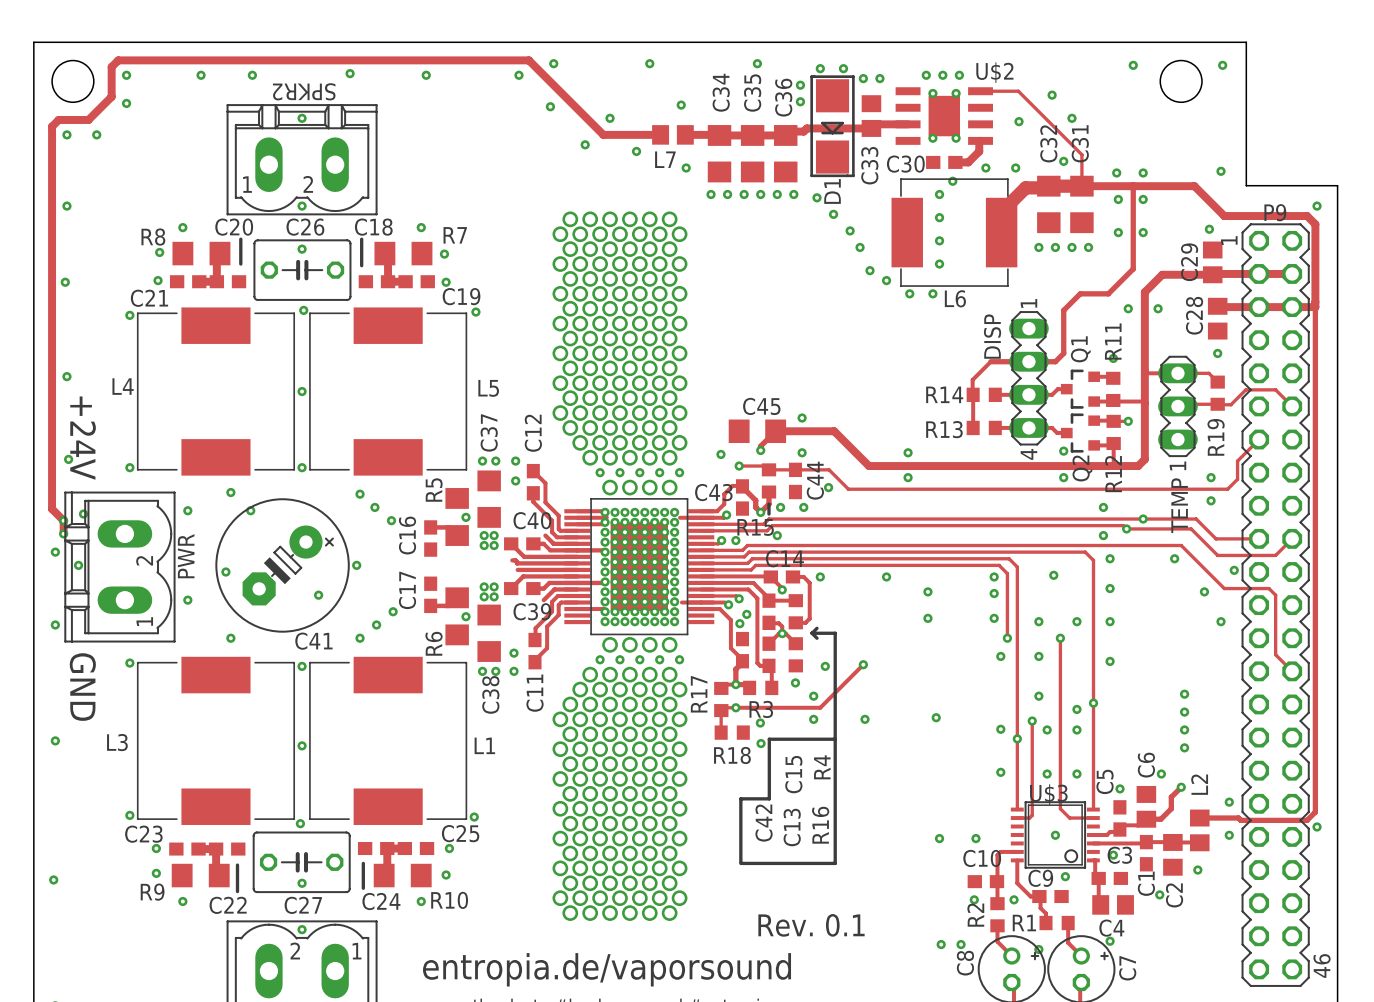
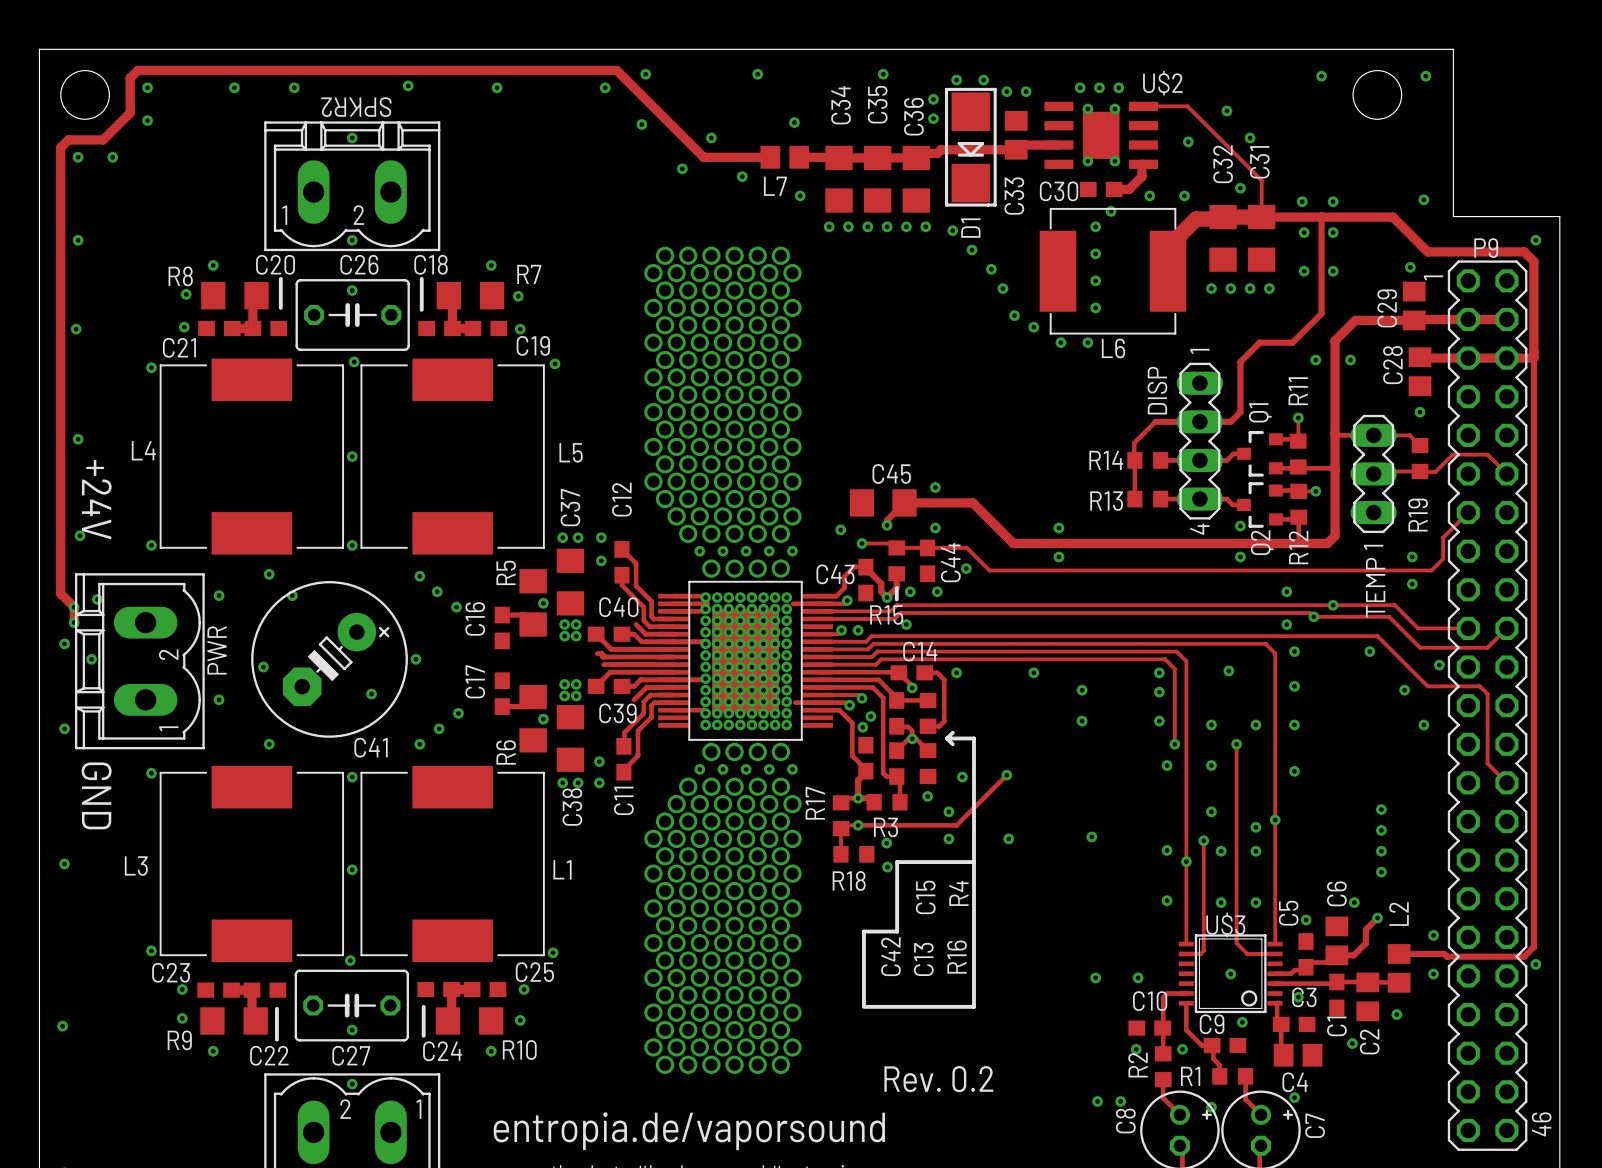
track: none -> (1298, 417) (1298, 440)
text: Rev. 0.1 (811, 925) -> Rev. 0.2 (938, 1079)

